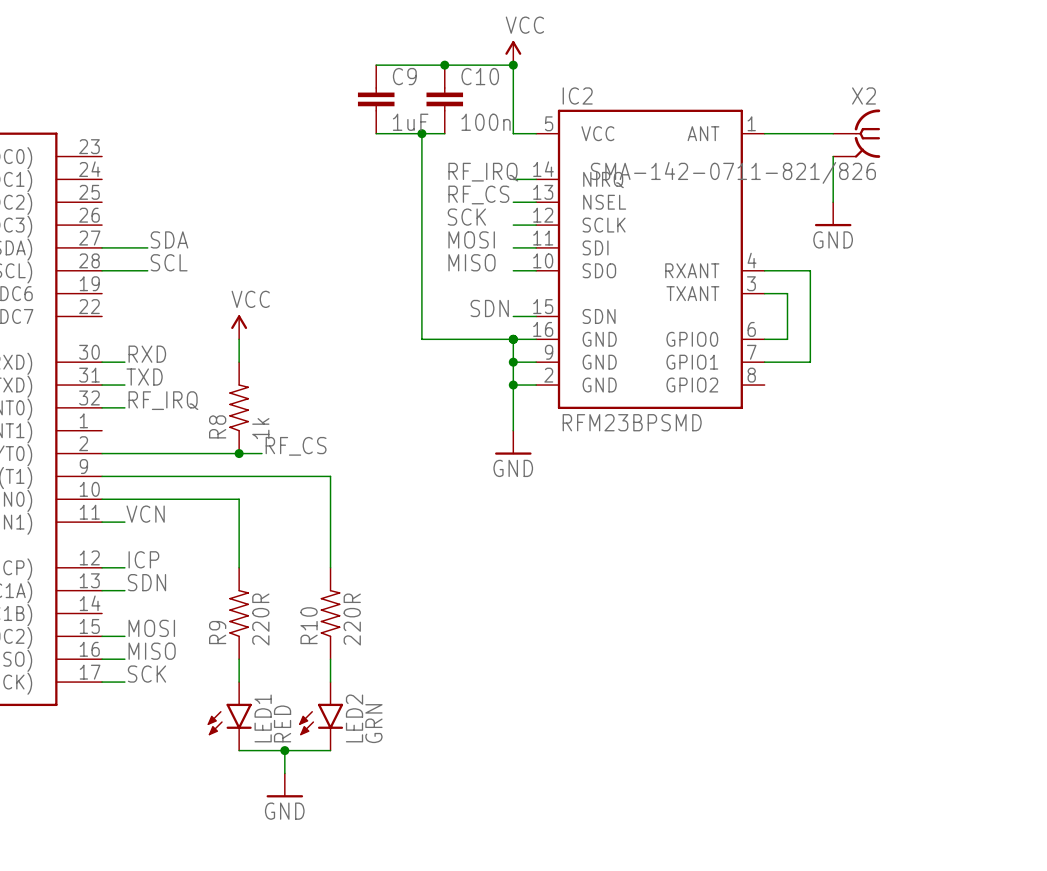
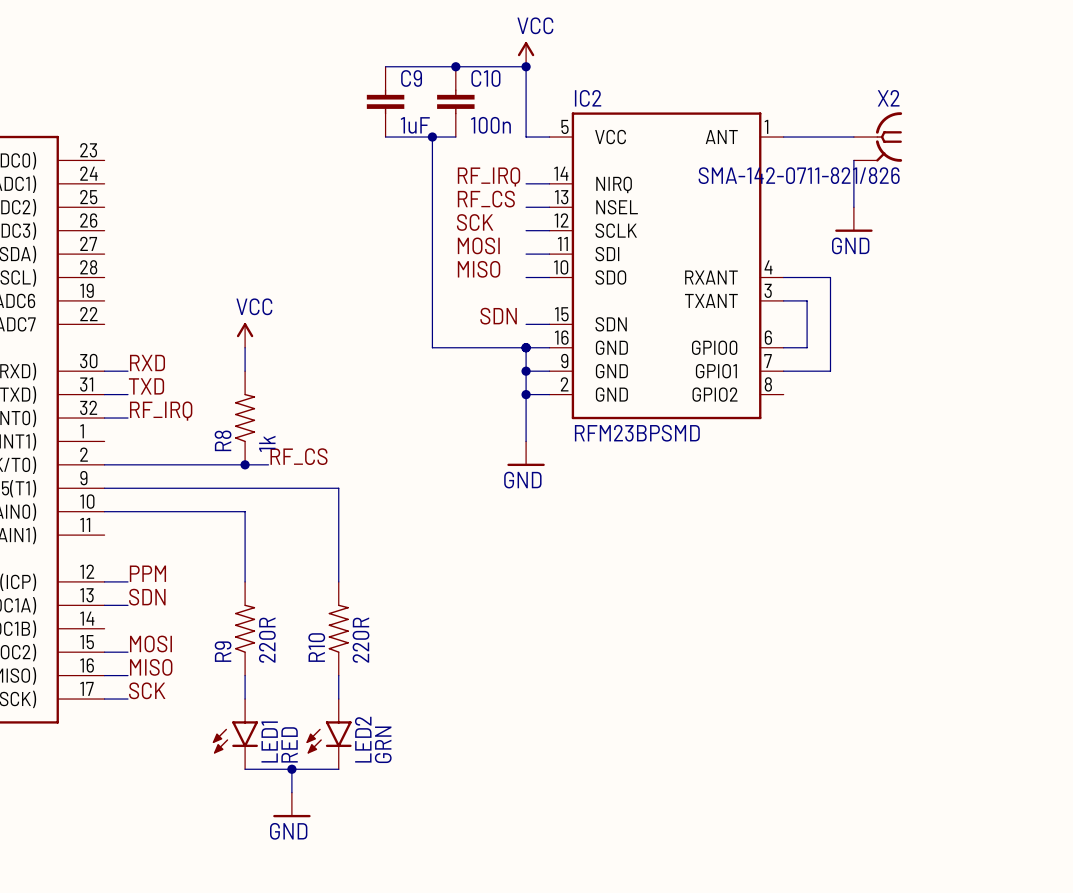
label: SDA (169, 239) -> none
wire: (102, 247) (147, 247) -> none
label: SCL (169, 262) -> none
wire: (102, 270) (147, 270) -> none
label: VCN (145, 514) -> none
wire: (102, 522) (124, 522) -> none
label: ICP (143, 559) -> PPM (147, 573)

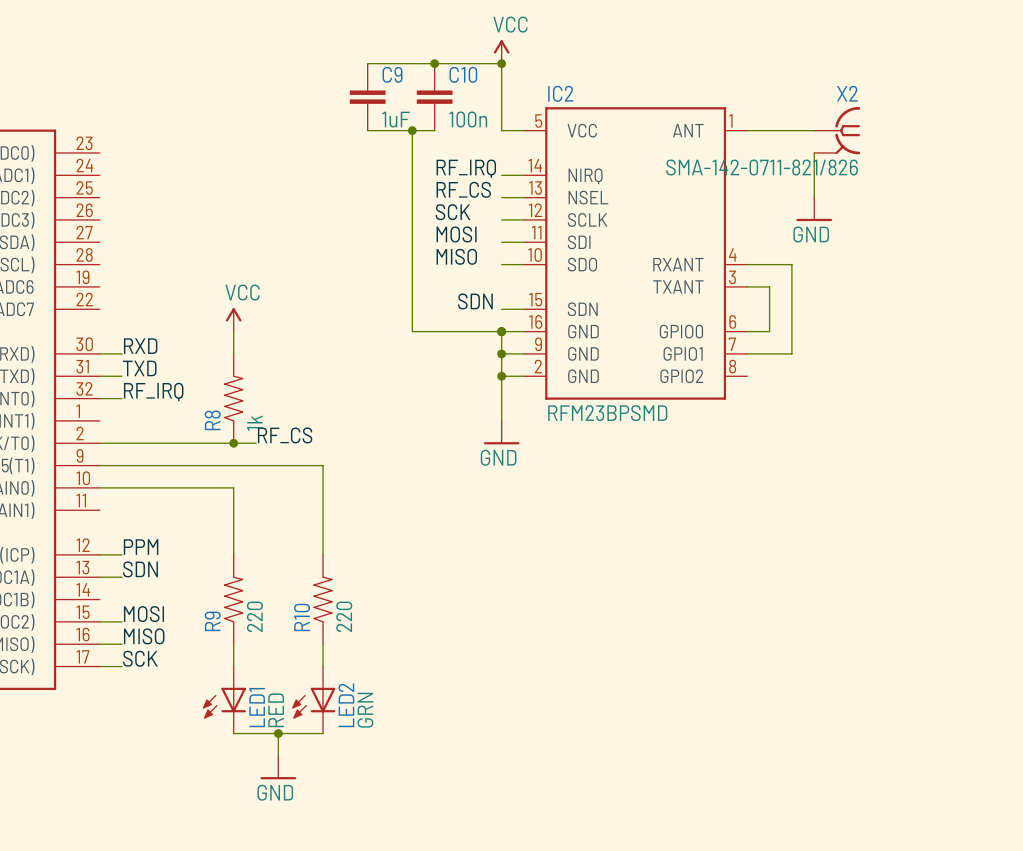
R9 value: 220R (267, 640) -> 220 (254, 616)
R10 value: 220R (361, 640) -> 220 (344, 616)
LED1 symbol: [212, 699, 258, 770] -> [202, 666, 246, 734]
LED2 symbol: [306, 699, 352, 770] -> [292, 666, 336, 734]

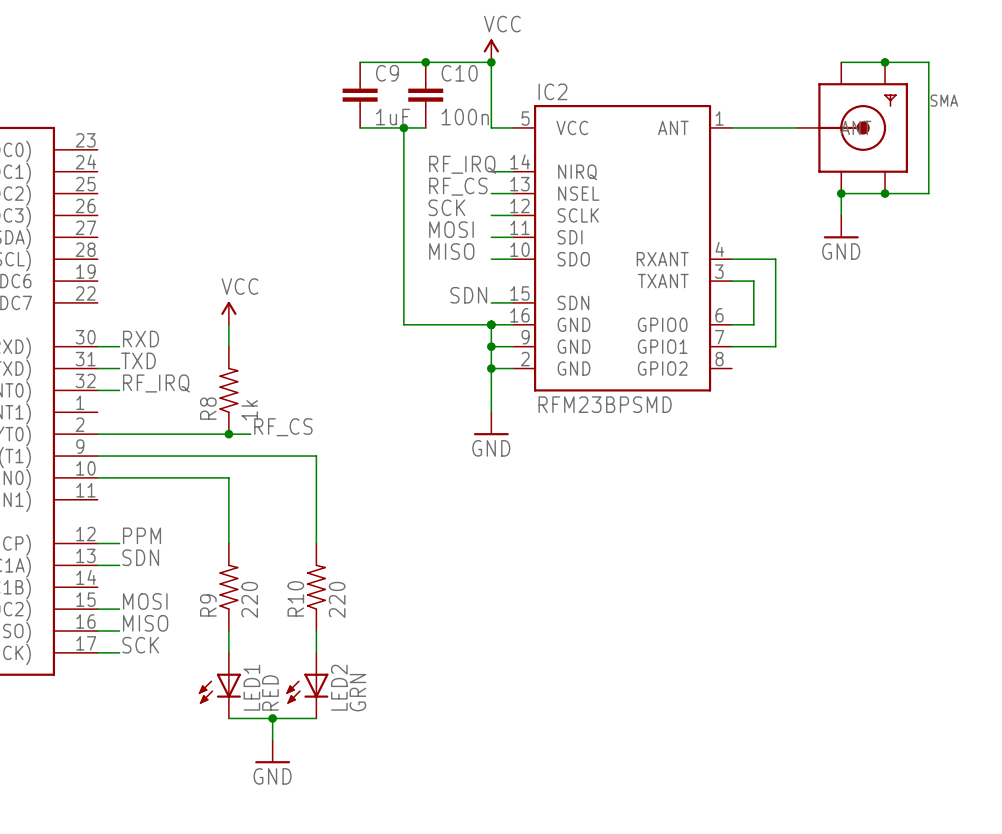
wire: none -> (841, 62) (928, 62) (928, 193) (841, 193) (841, 215)
junction: none -> (885, 62)
X2: SMA-142-0711-821/826 (837, 130) -> none
SMA: none -> (852, 127)
wire: (814, 152) (814, 197) -> none
junction: none -> (841, 193)
junction: none -> (885, 193)
power symbol position: GND (814, 209) -> GND (841, 226)

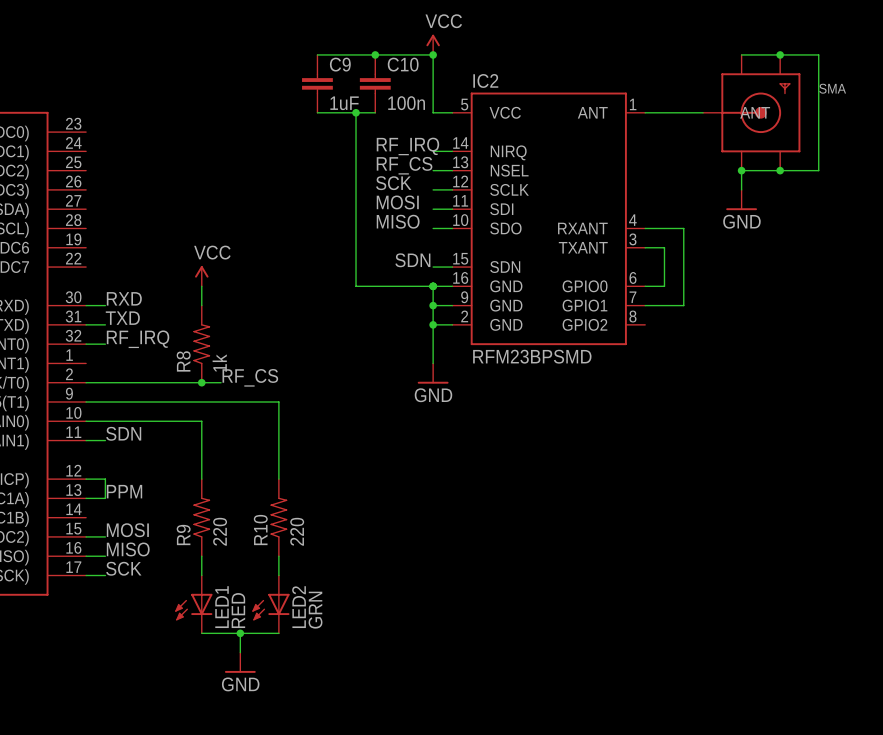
label: none -> SDN (123, 433)
wire: none -> (86, 440) (105, 440)
label: PPM (142, 535) -> none
wire: none -> (105, 479) (105, 498)
label: SDN (140, 557) -> PPM (124, 491)

